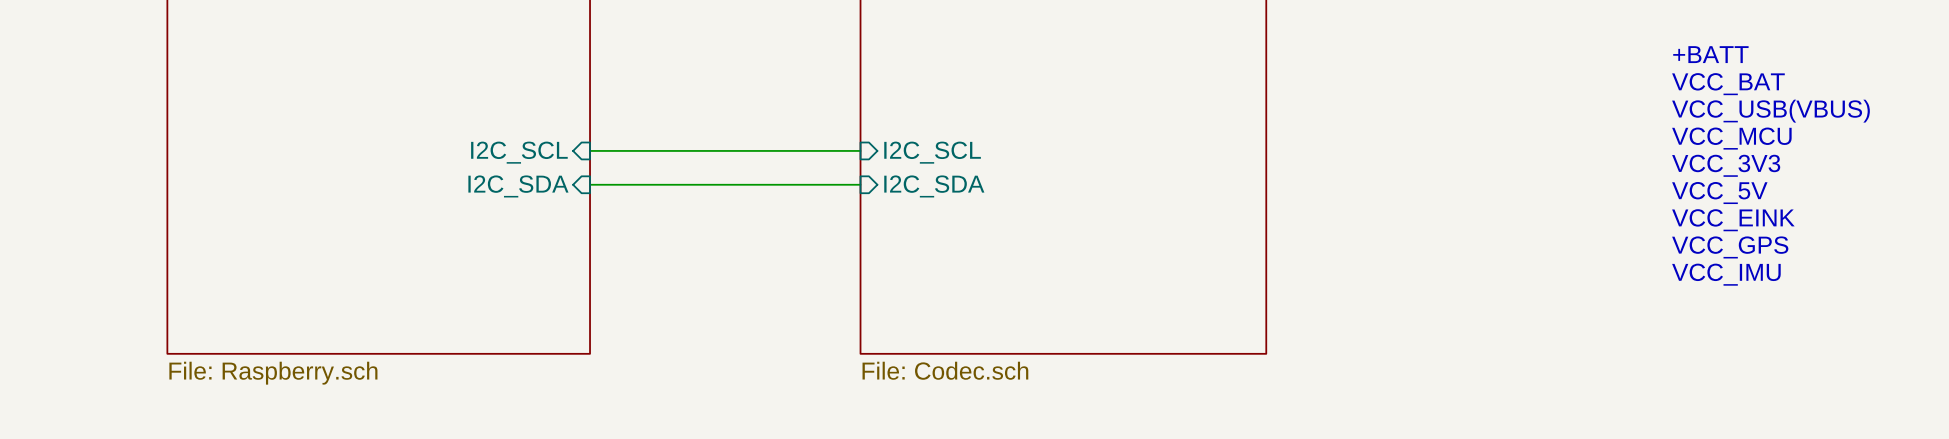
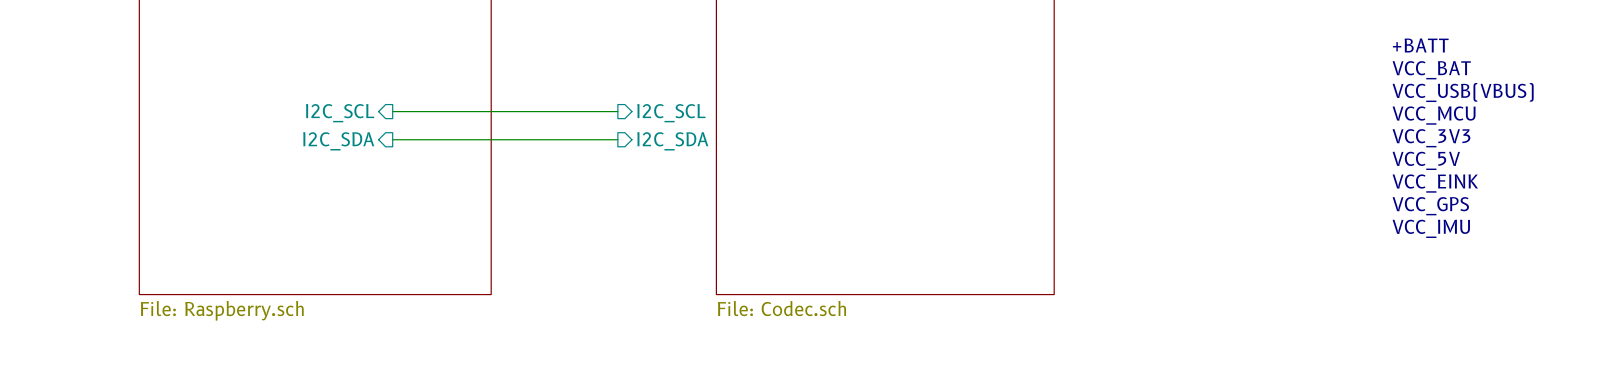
sheet pin: none -> I2C_SCL (340, 113)
sheet pin: none -> I2C_SCL (671, 113)
wire: (590, 150) (860, 150) -> (392, 111) (617, 111)
sheet pin: I2C_SCL (519, 152) -> none
sheet pin: I2C_SCL (932, 152) -> none
sheet pin: none -> I2C_SDA (338, 141)
sheet pin: none -> I2C_SDA (672, 141)
wire: (590, 184) (860, 184) -> (392, 139) (617, 139)
sheet pin: I2C_SDA (518, 186) -> none
sheet pin: I2C_SDA (934, 186) -> none

